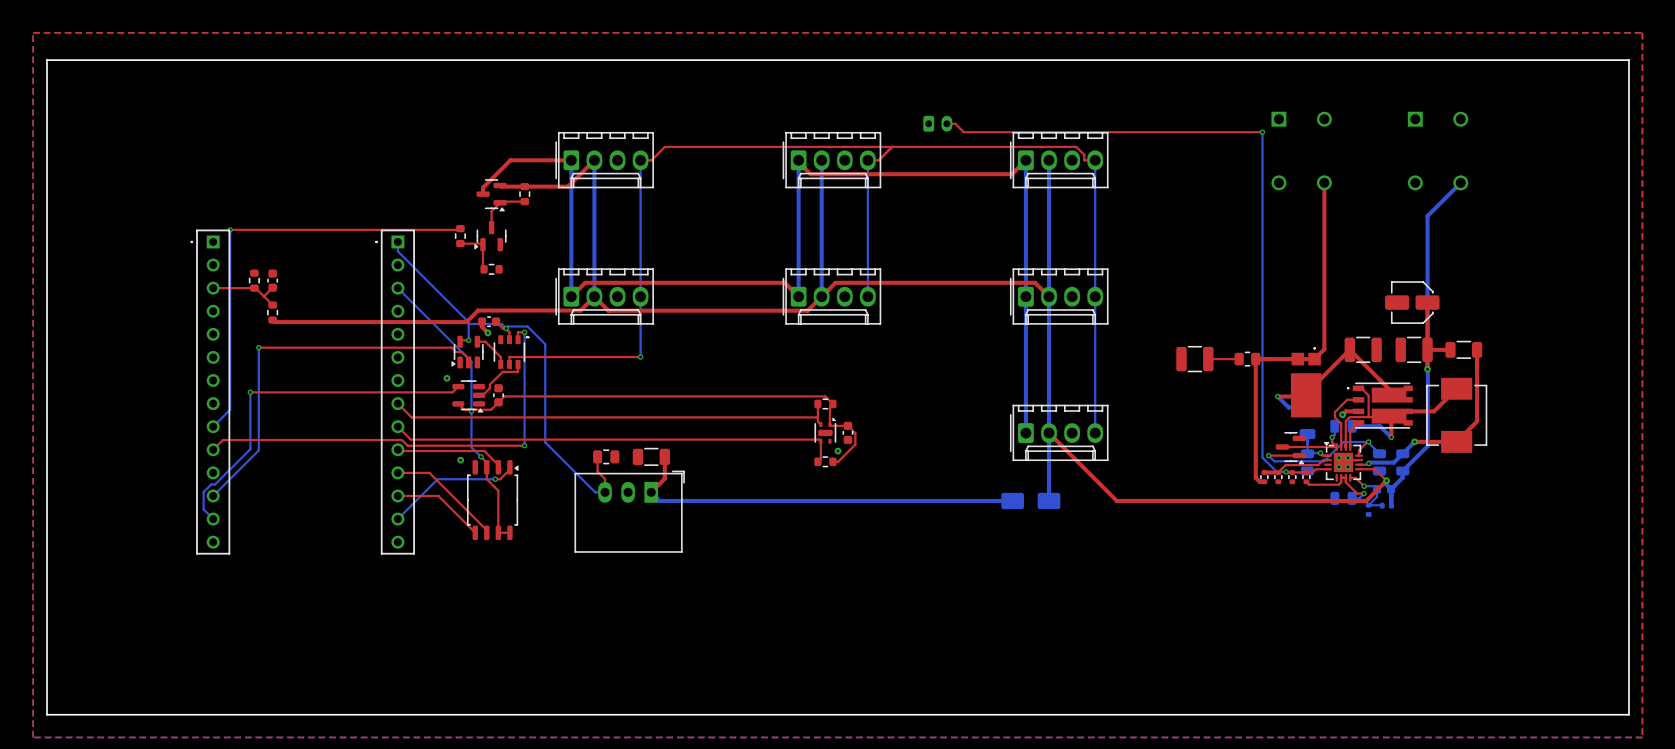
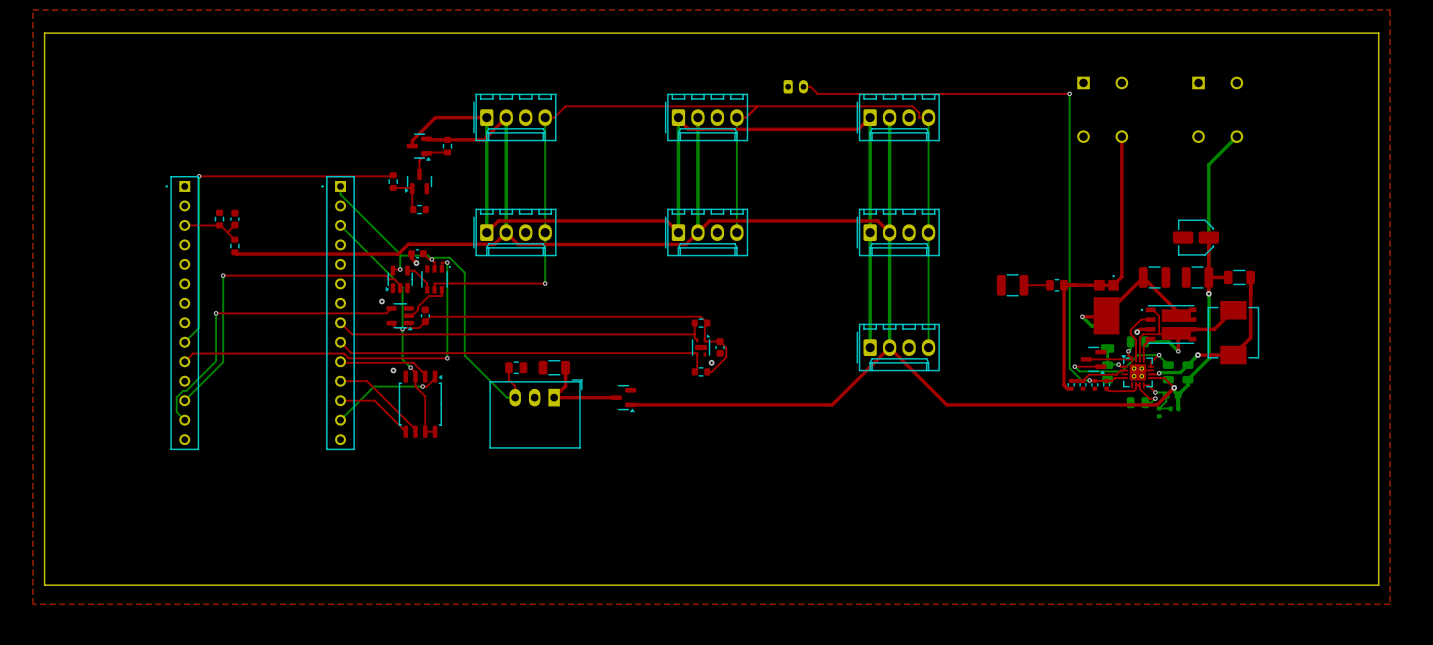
top track: none -> (889, 347) (832, 404) (630, 404)
bottom track: (1049, 433) (1049, 500) -> none
top track: none -> (554, 397) (616, 397)
bottom track: (651, 492) (659, 500) (1012, 500) -> none
part: none -> (623, 398)
part: (1030, 500) -> none

